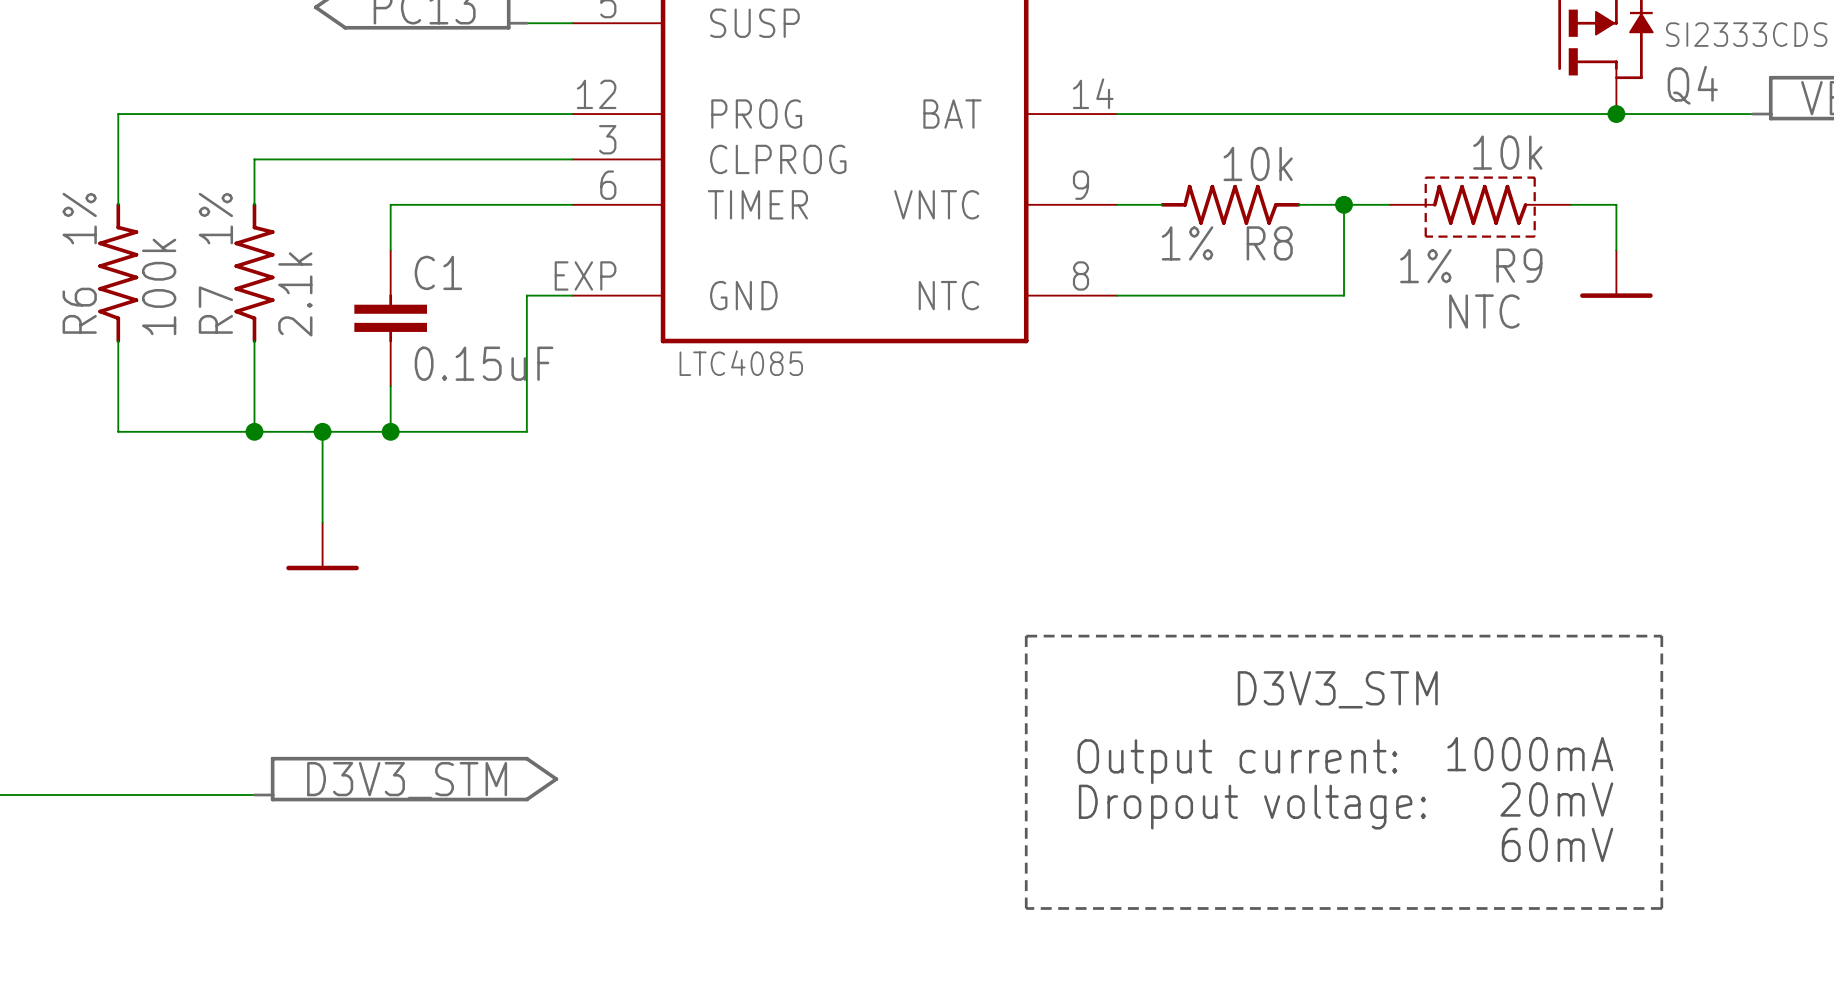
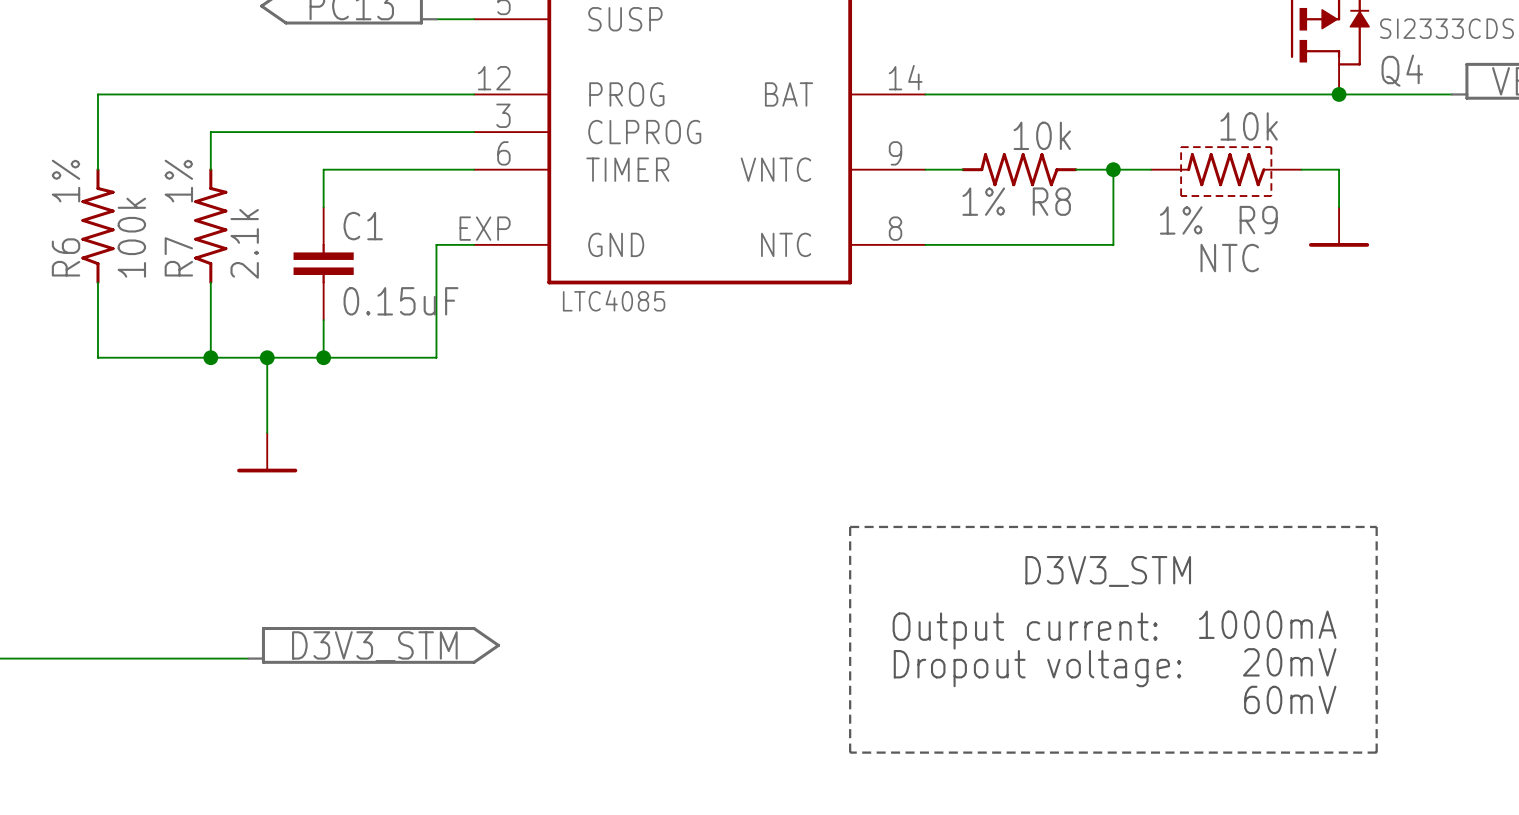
part position: (405, 779) -> (373, 645)
label position: D3V3_STM (407, 780) -> D3V3_STM (374, 646)
wire: none -> (210, 658) (248, 658)

